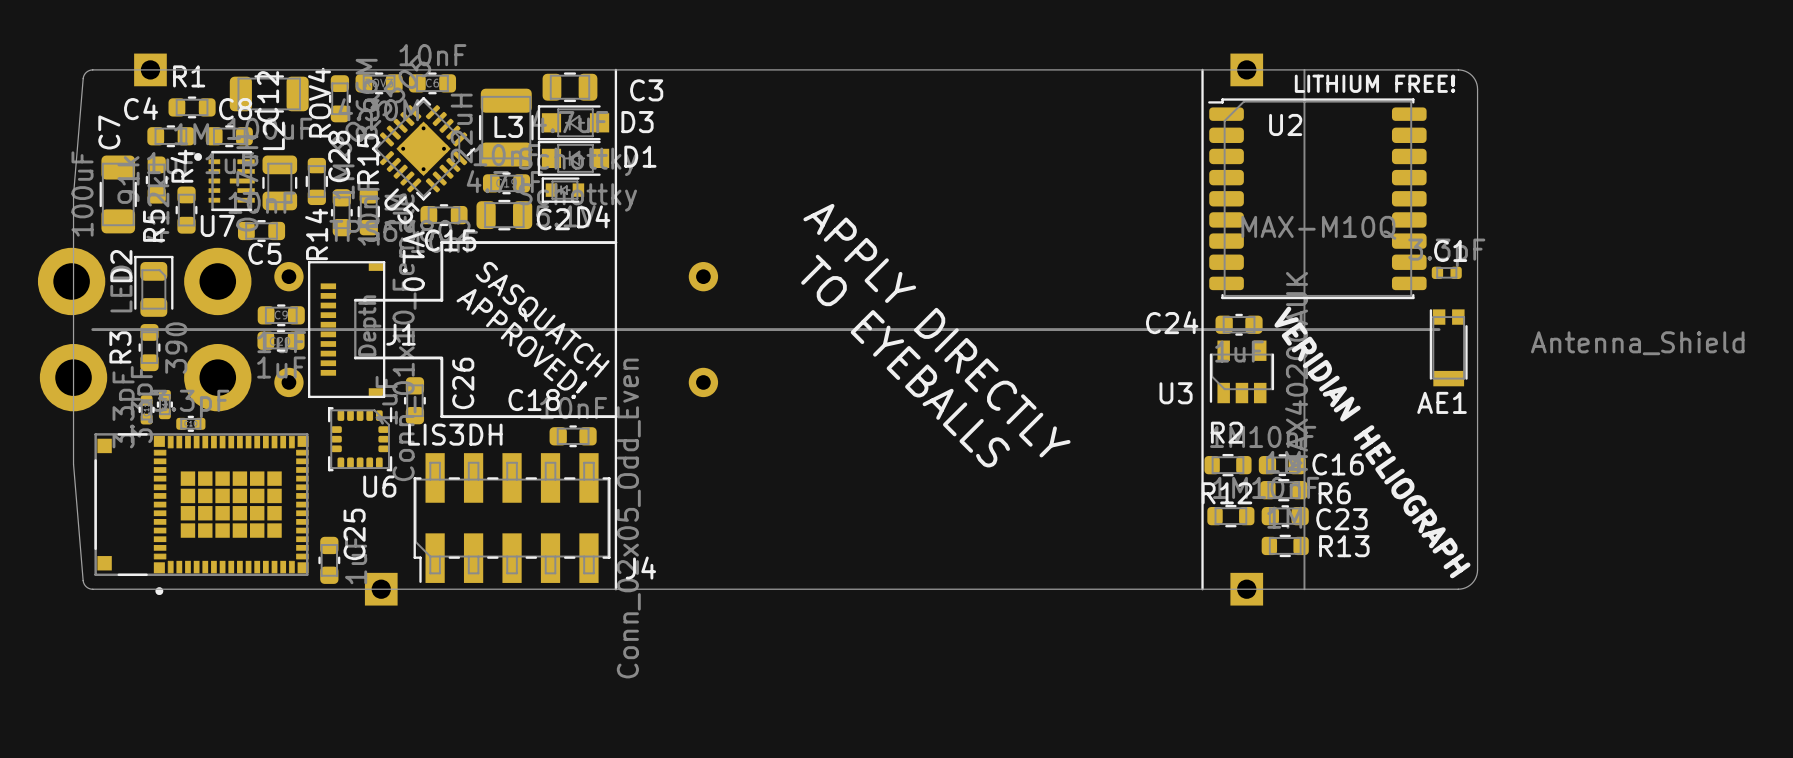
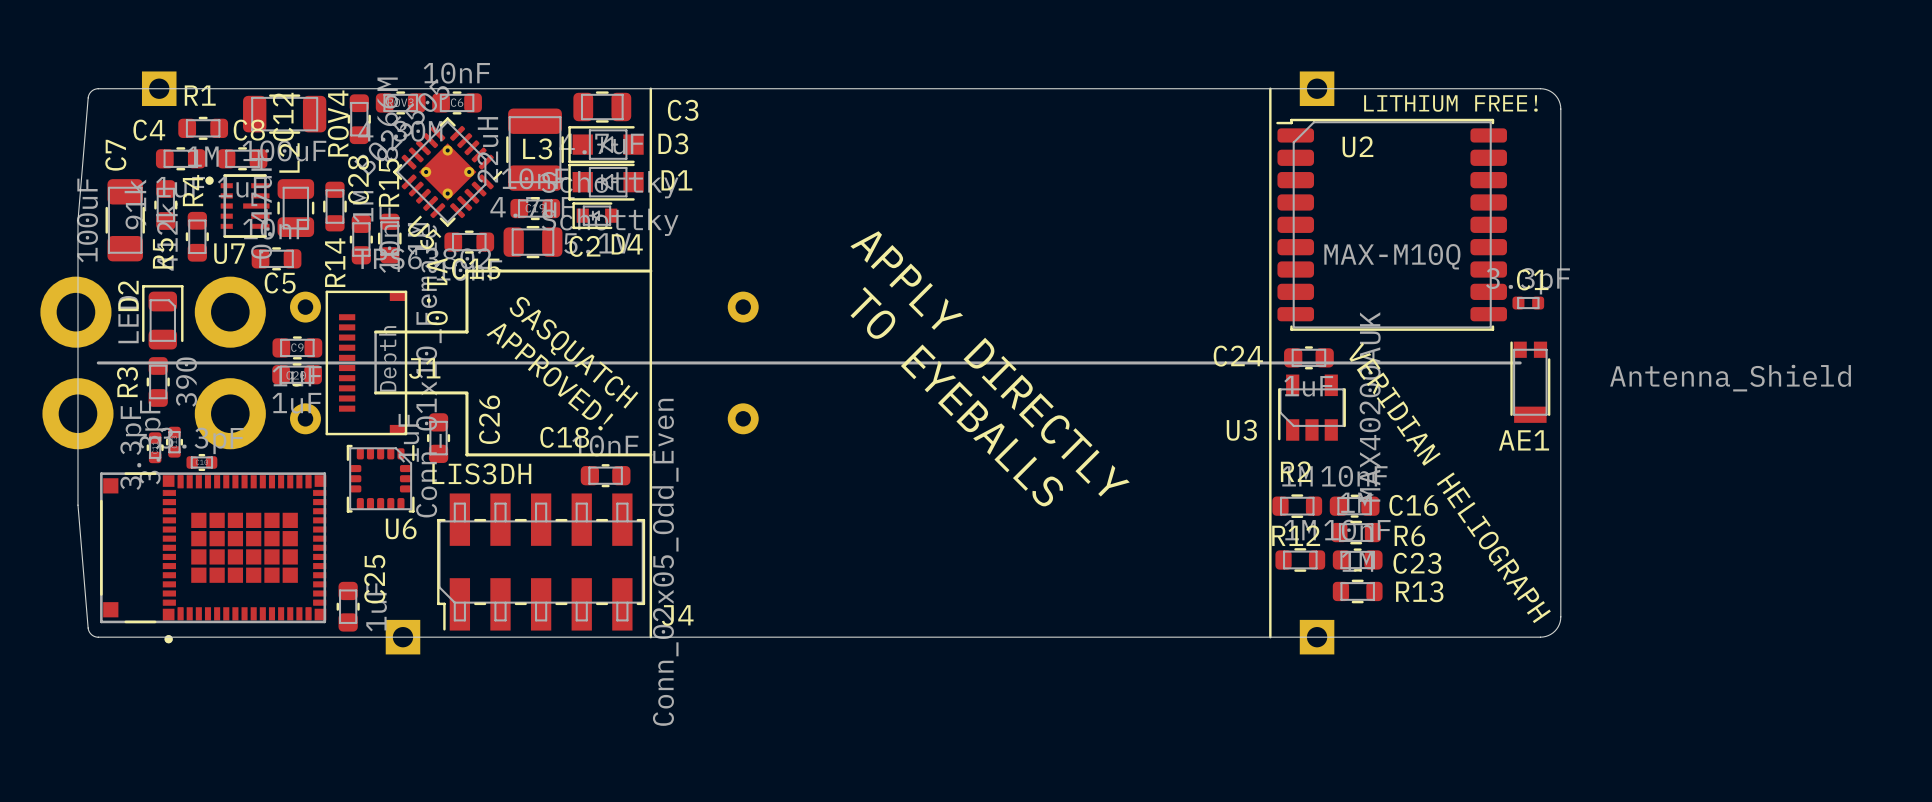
line: (1304, 69) (1304, 589) -> none

